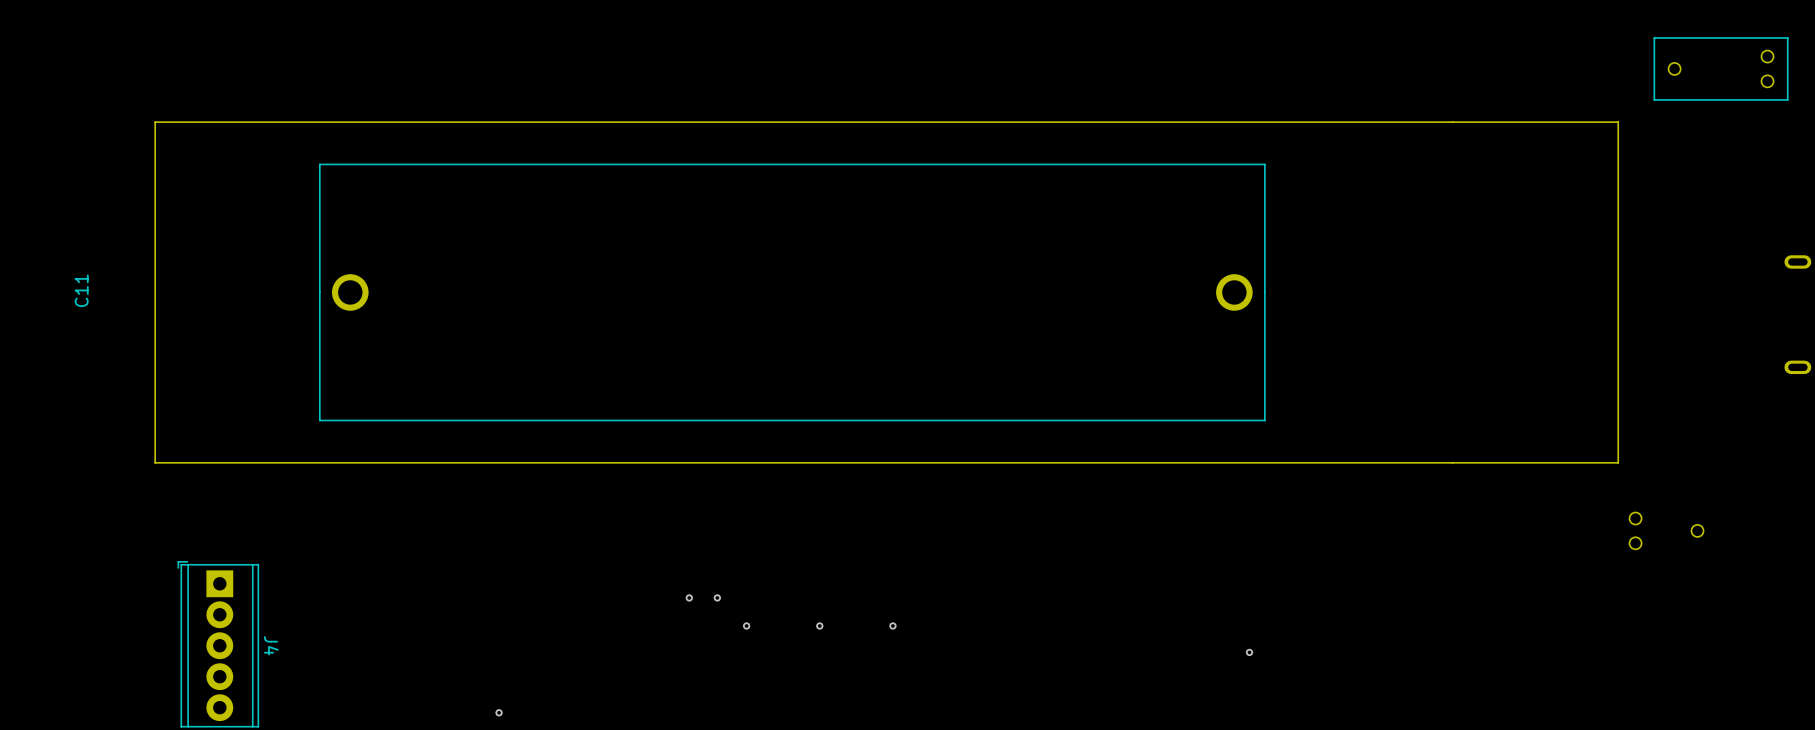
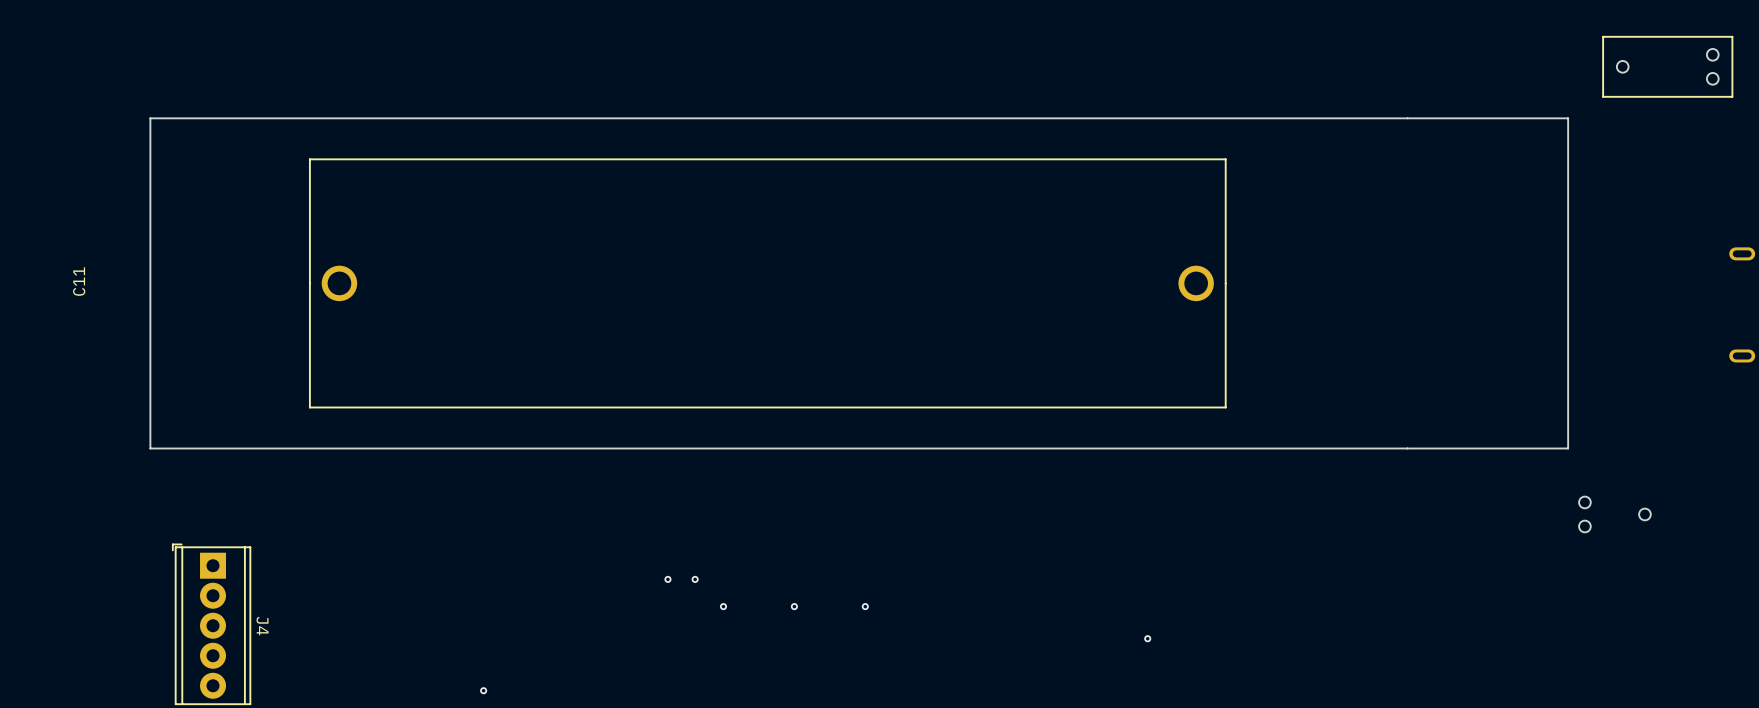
via position: (1249, 652) -> (1147, 638)

